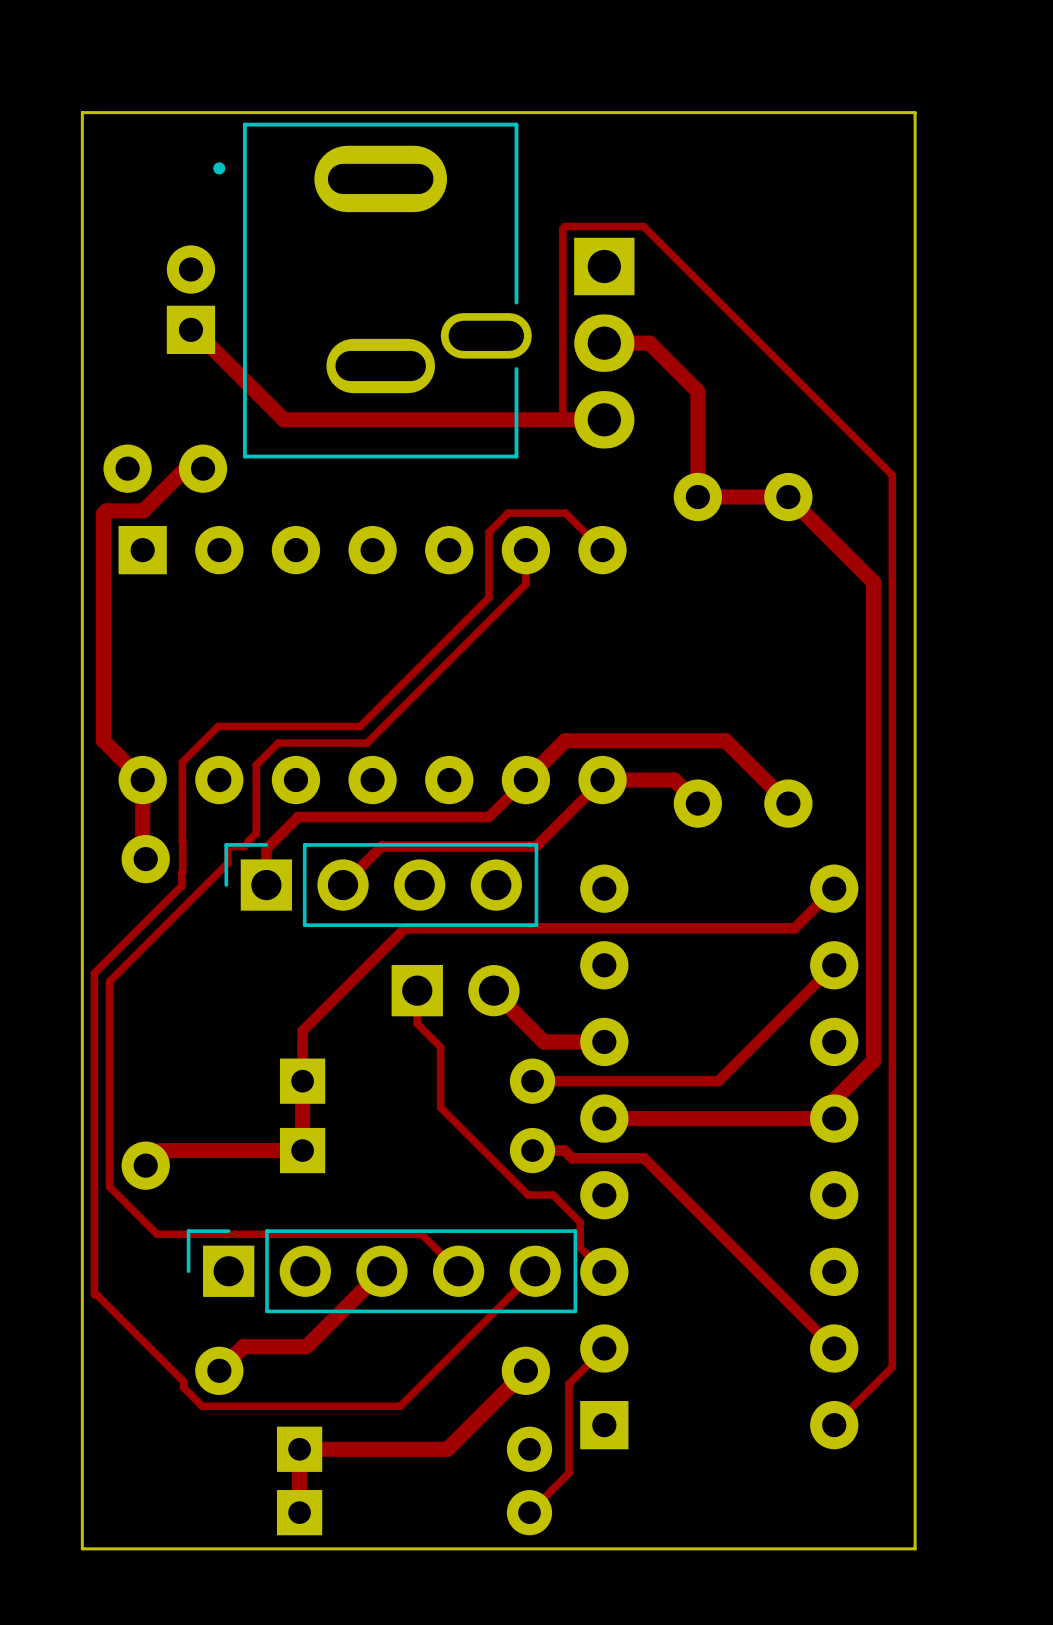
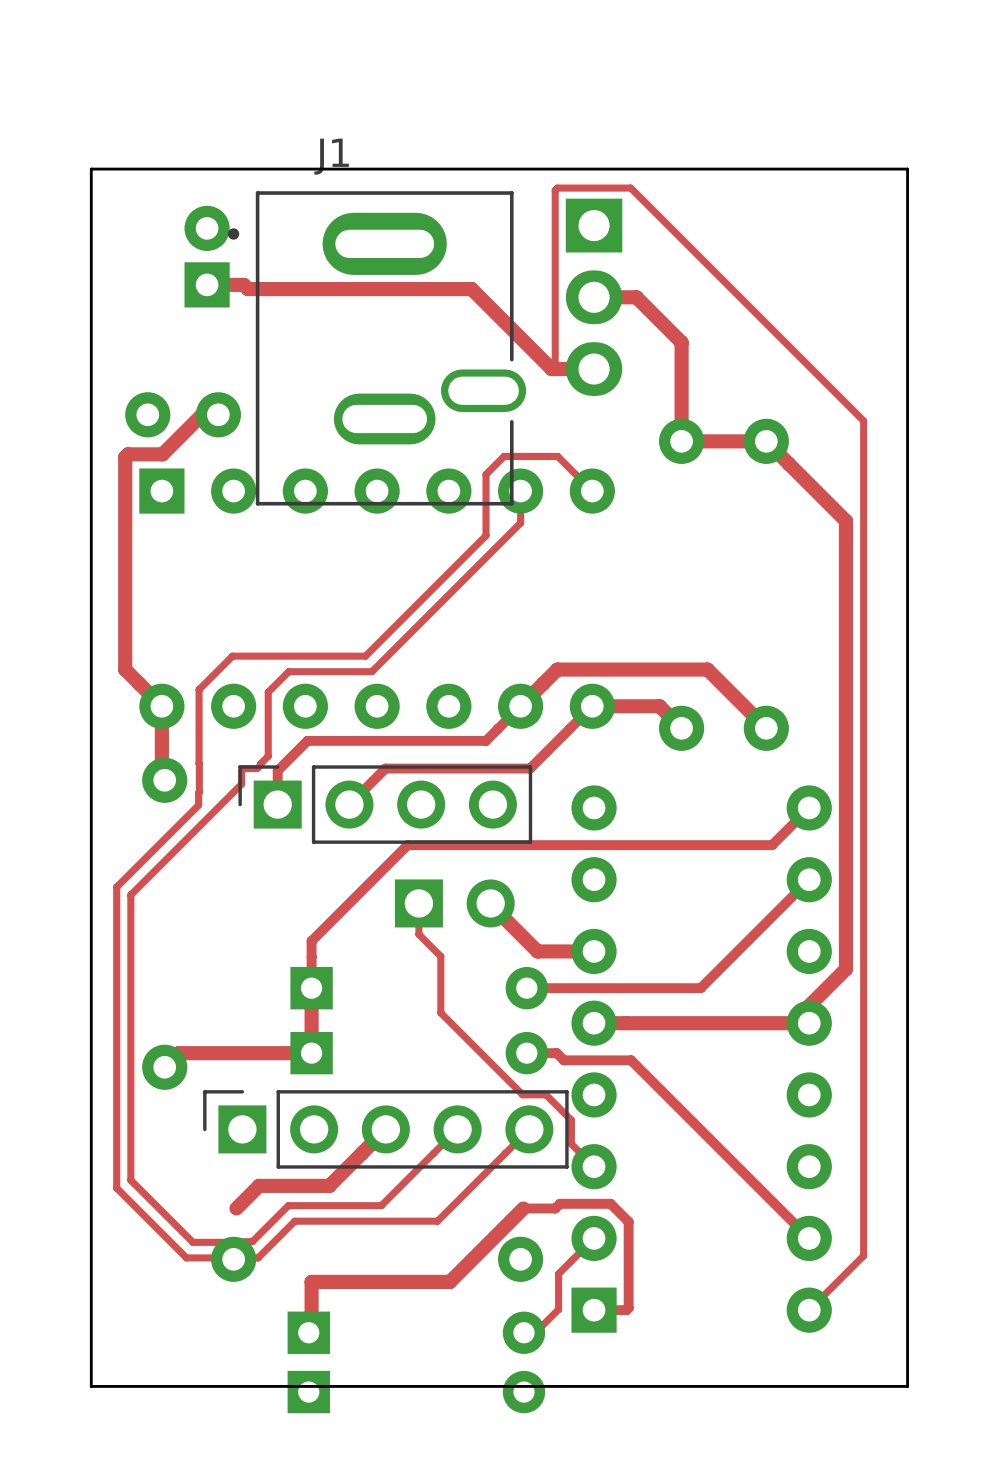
board edge: (82, 112) (915, 112) (915, 1548) (82, 1548) (82, 112) -> (91, 169) (91, 1386) (907, 1386) (907, 169) (91, 169)
part: (372, 290) -> none
track: (193, 329) (283, 419) (559, 419) -> (209, 284) (243, 284) (247, 289) (471, 289) (551, 369)
J1: none -> (377, 348)
track: (109, 1186) (157, 1234) (421, 1234) (458, 1271) -> (130, 1087) (130, 1180) (192, 1242) (229, 1242)
track: none -> (385, 1129) (329, 1185) (259, 1185) (236, 1208)
track: none -> (457, 1129) (381, 1205) (288, 1205) (252, 1241) (230, 1241)
track: (381, 1271) (306, 1346) (243, 1346) (219, 1370) -> none
part position: (381, 1271) -> (385, 1129)
track: (535, 1271) (400, 1406) (202, 1406) (183, 1387) (183, 1381) (96, 1294) (94, 1294) -> (529, 1129) (437, 1221) (294, 1221) (258, 1257) (186, 1257) (116, 1188)
track: (525, 1370) (447, 1449) (299, 1449) (299, 1512) -> none
track: (568, 1383) (568, 1473) (529, 1512) -> (560, 1271) (558, 1273) (558, 1309) (526, 1341)
track: none -> (594, 1310) (626, 1310) (628, 1308) (628, 1221) (610, 1203) (560, 1203) (555, 1208) (523, 1208) (449, 1281) (311, 1281) (311, 1341)

